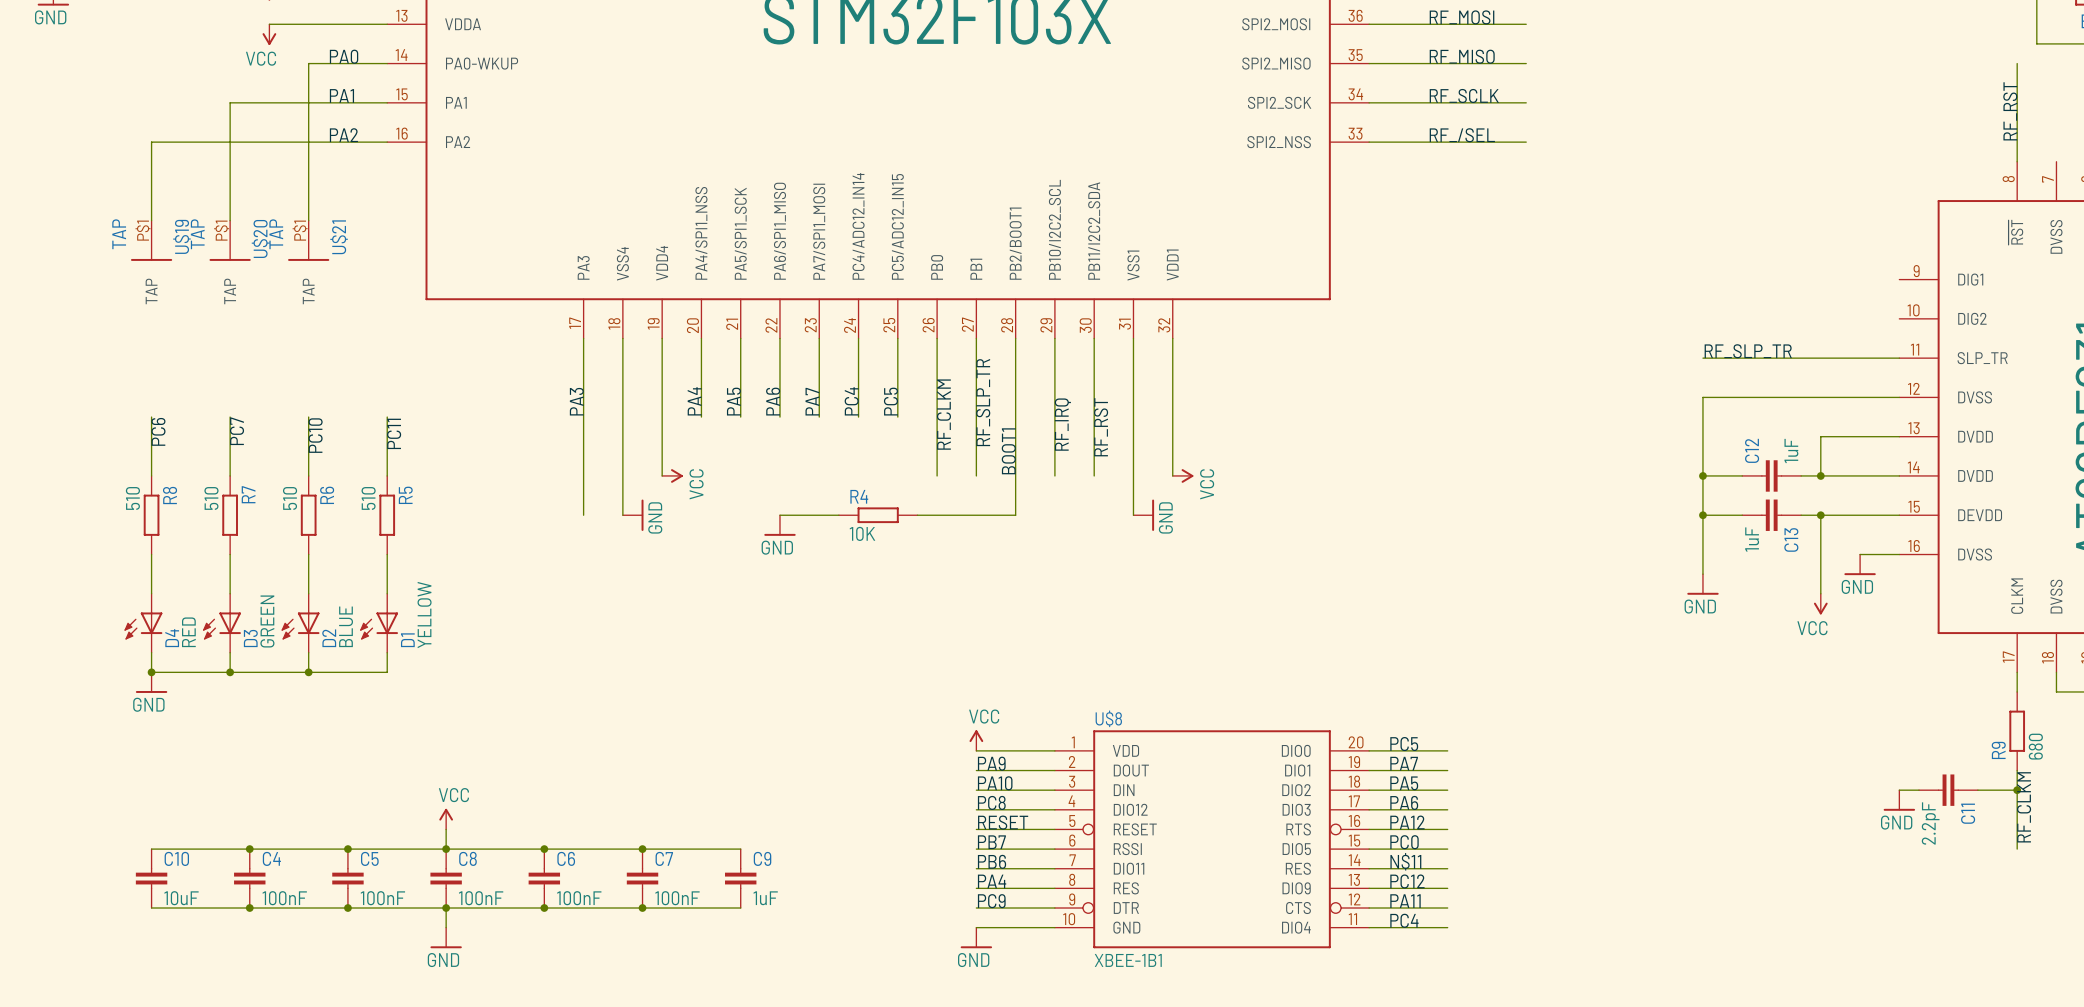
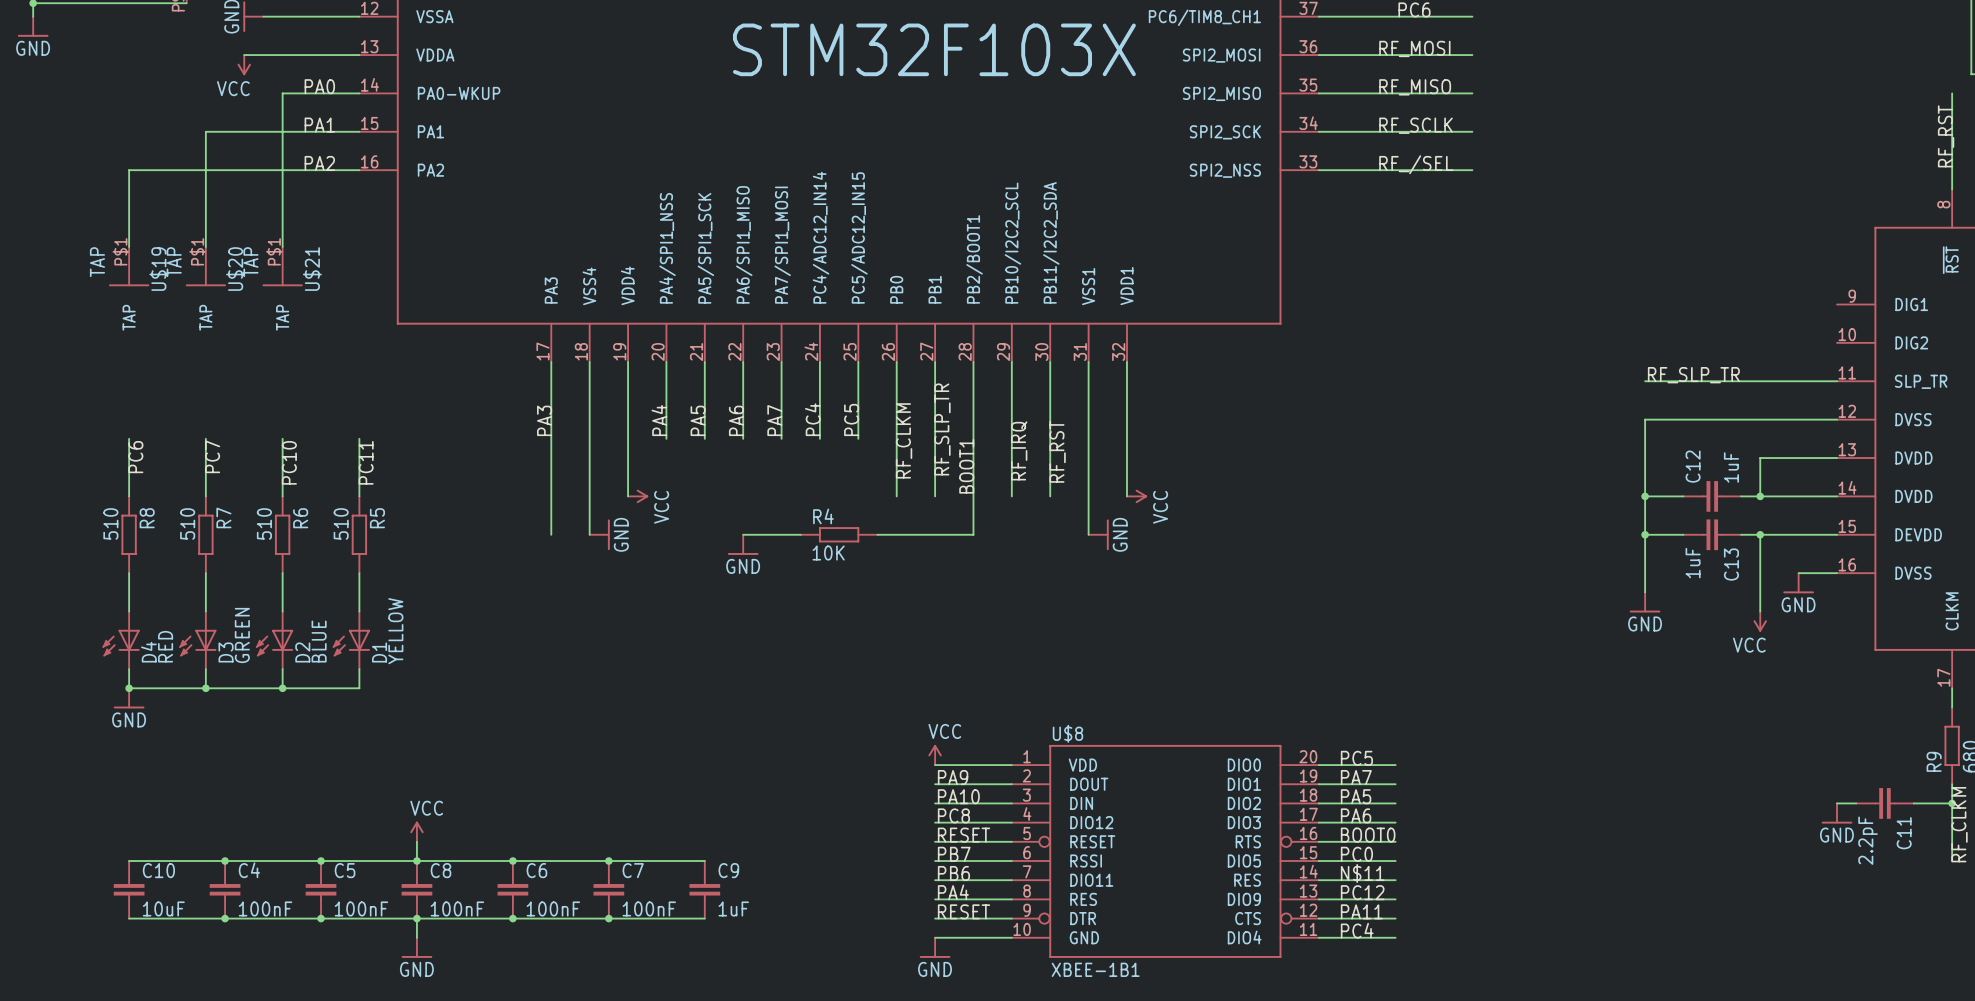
label: PA12 (1407, 822) -> BOOT0 (1368, 835)
label: PC9 (991, 901) -> RESET (964, 911)

